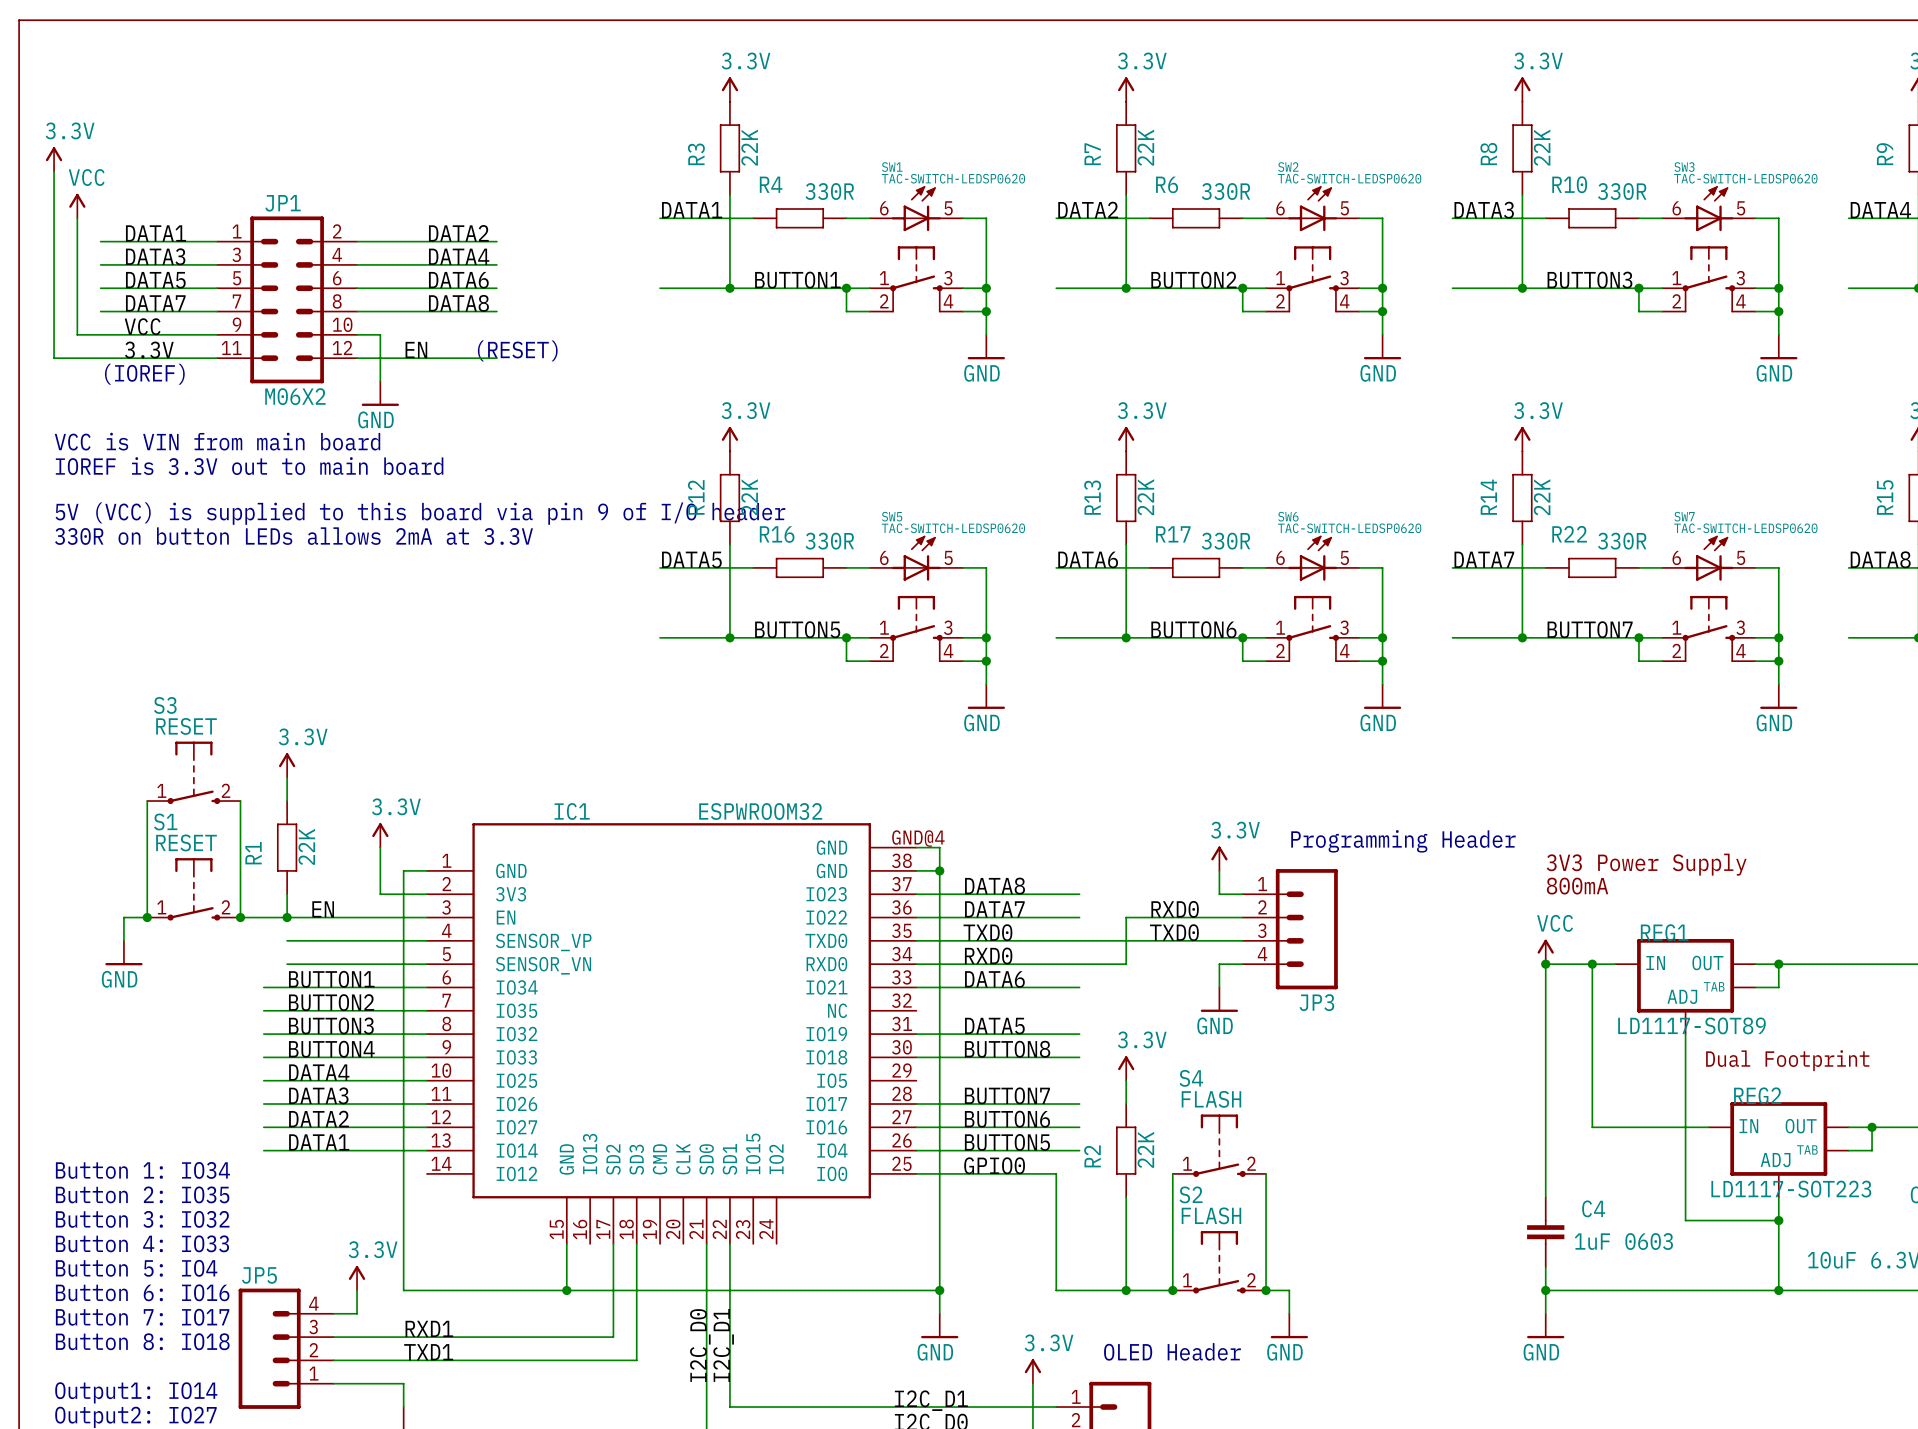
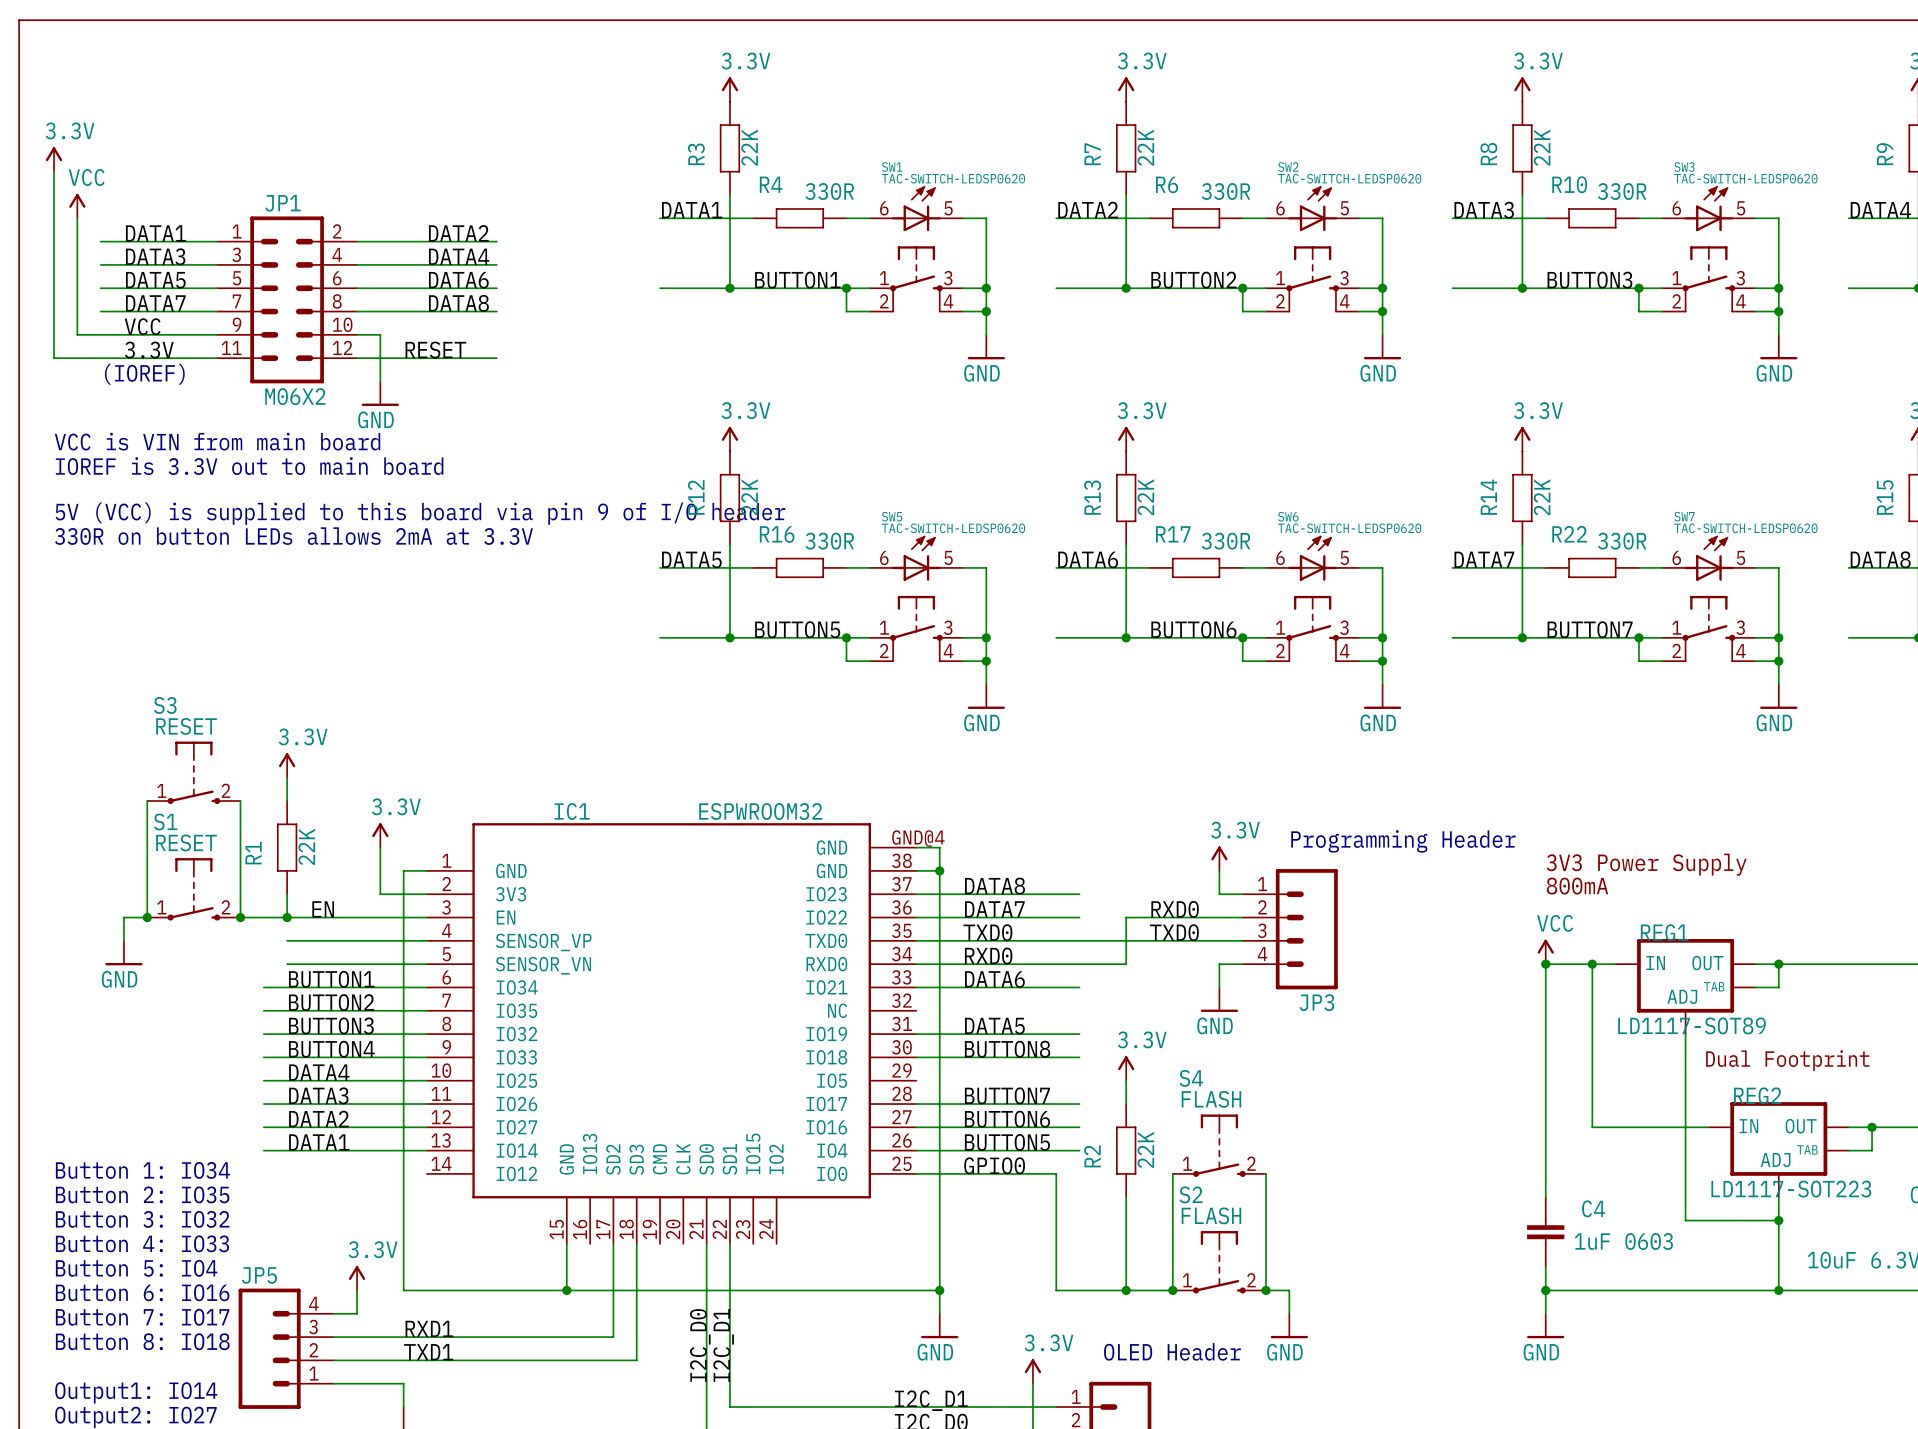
label: EN (416, 350) -> RESET (435, 350)
text: (RESET) (517, 350) -> none

